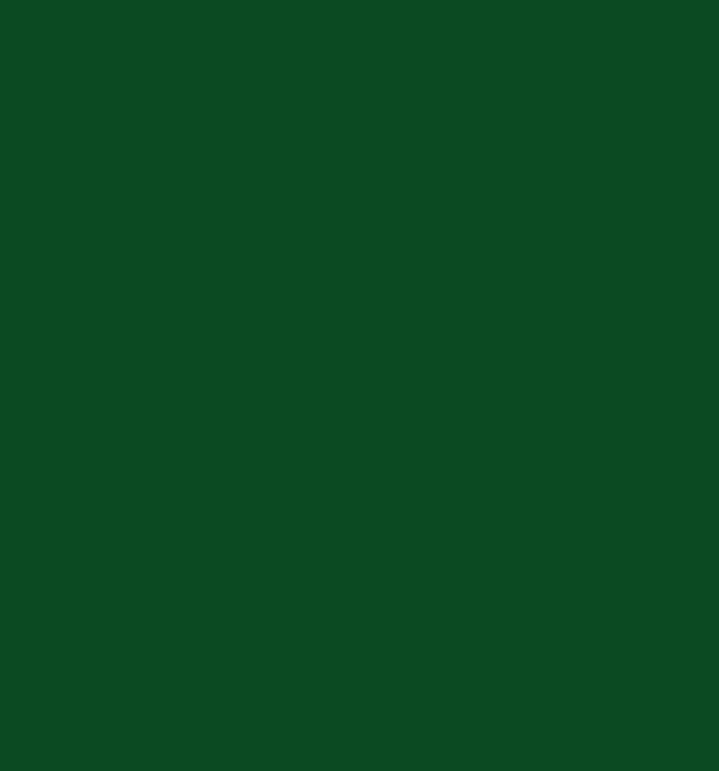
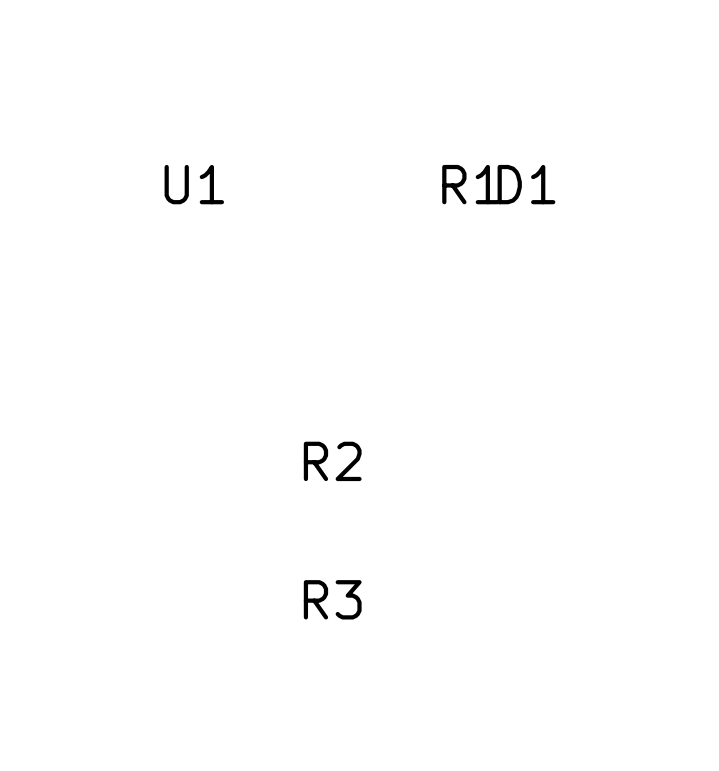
U1: none -> (194, 184)
R1: none -> (471, 184)
D1: none -> (526, 184)
R2: none -> (332, 461)
R3: none -> (332, 599)

